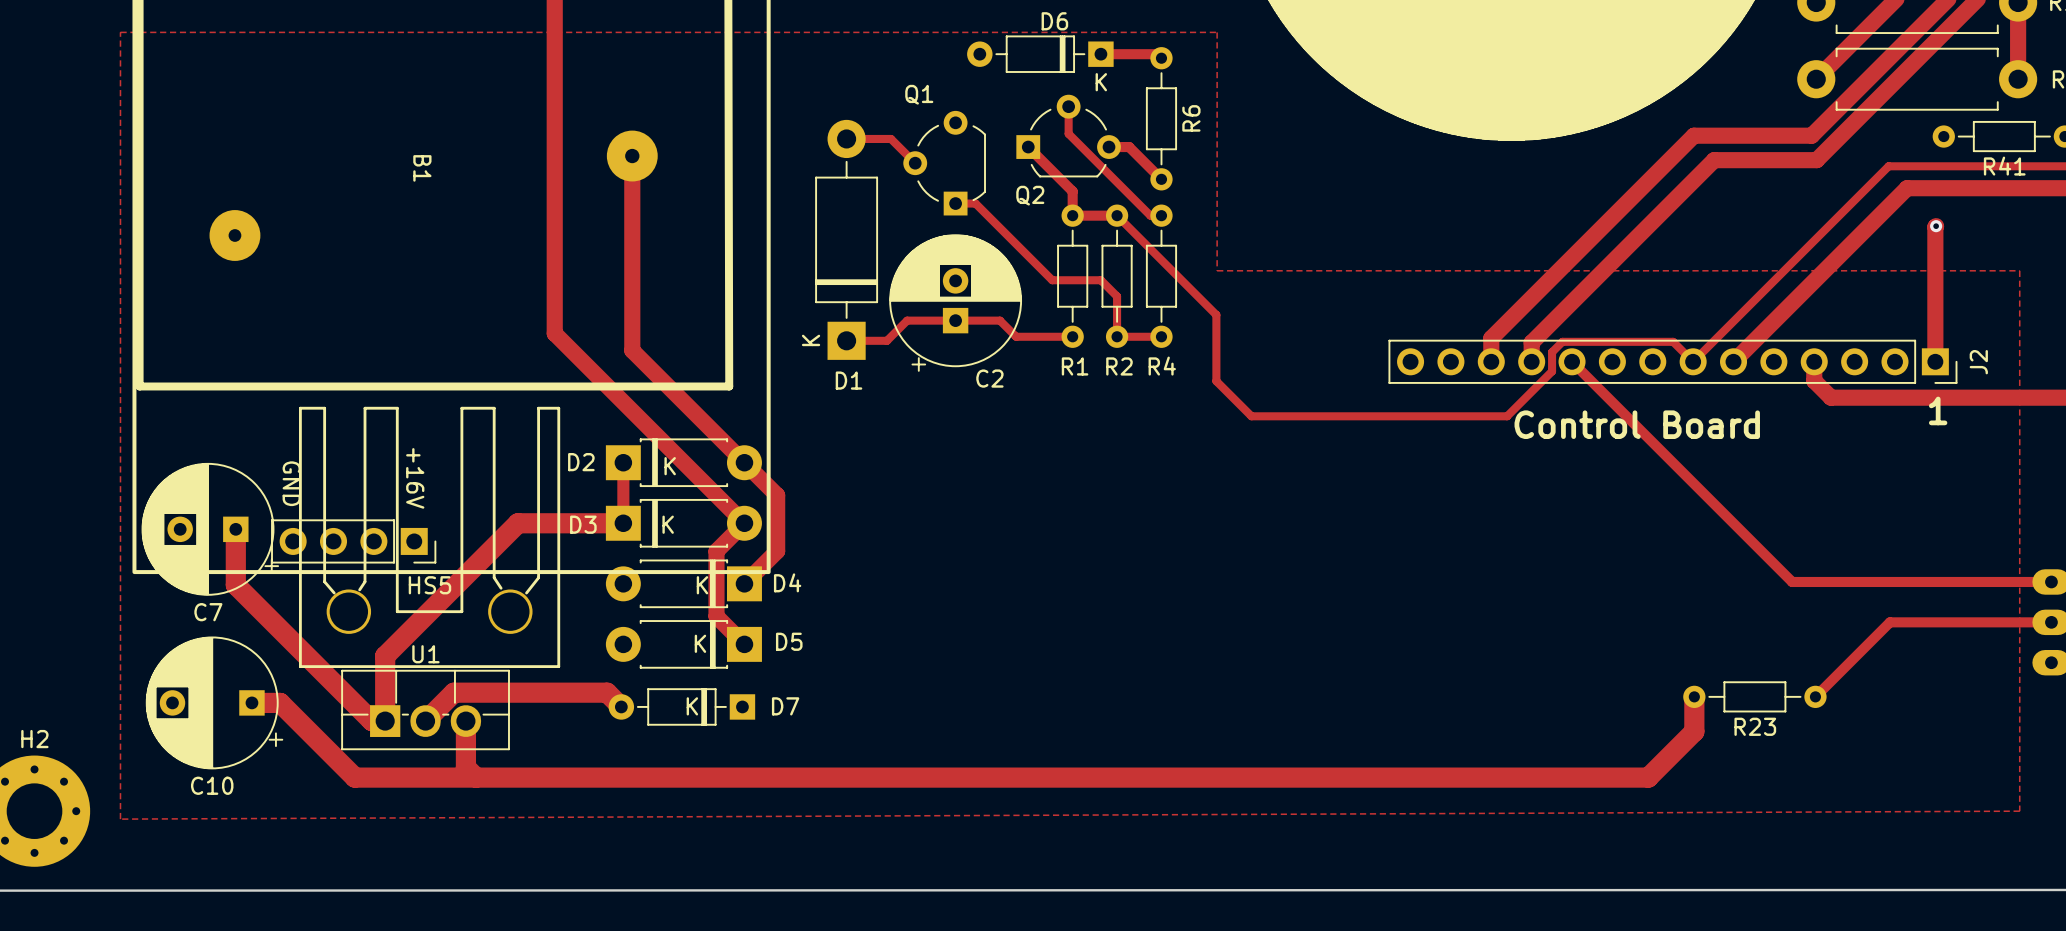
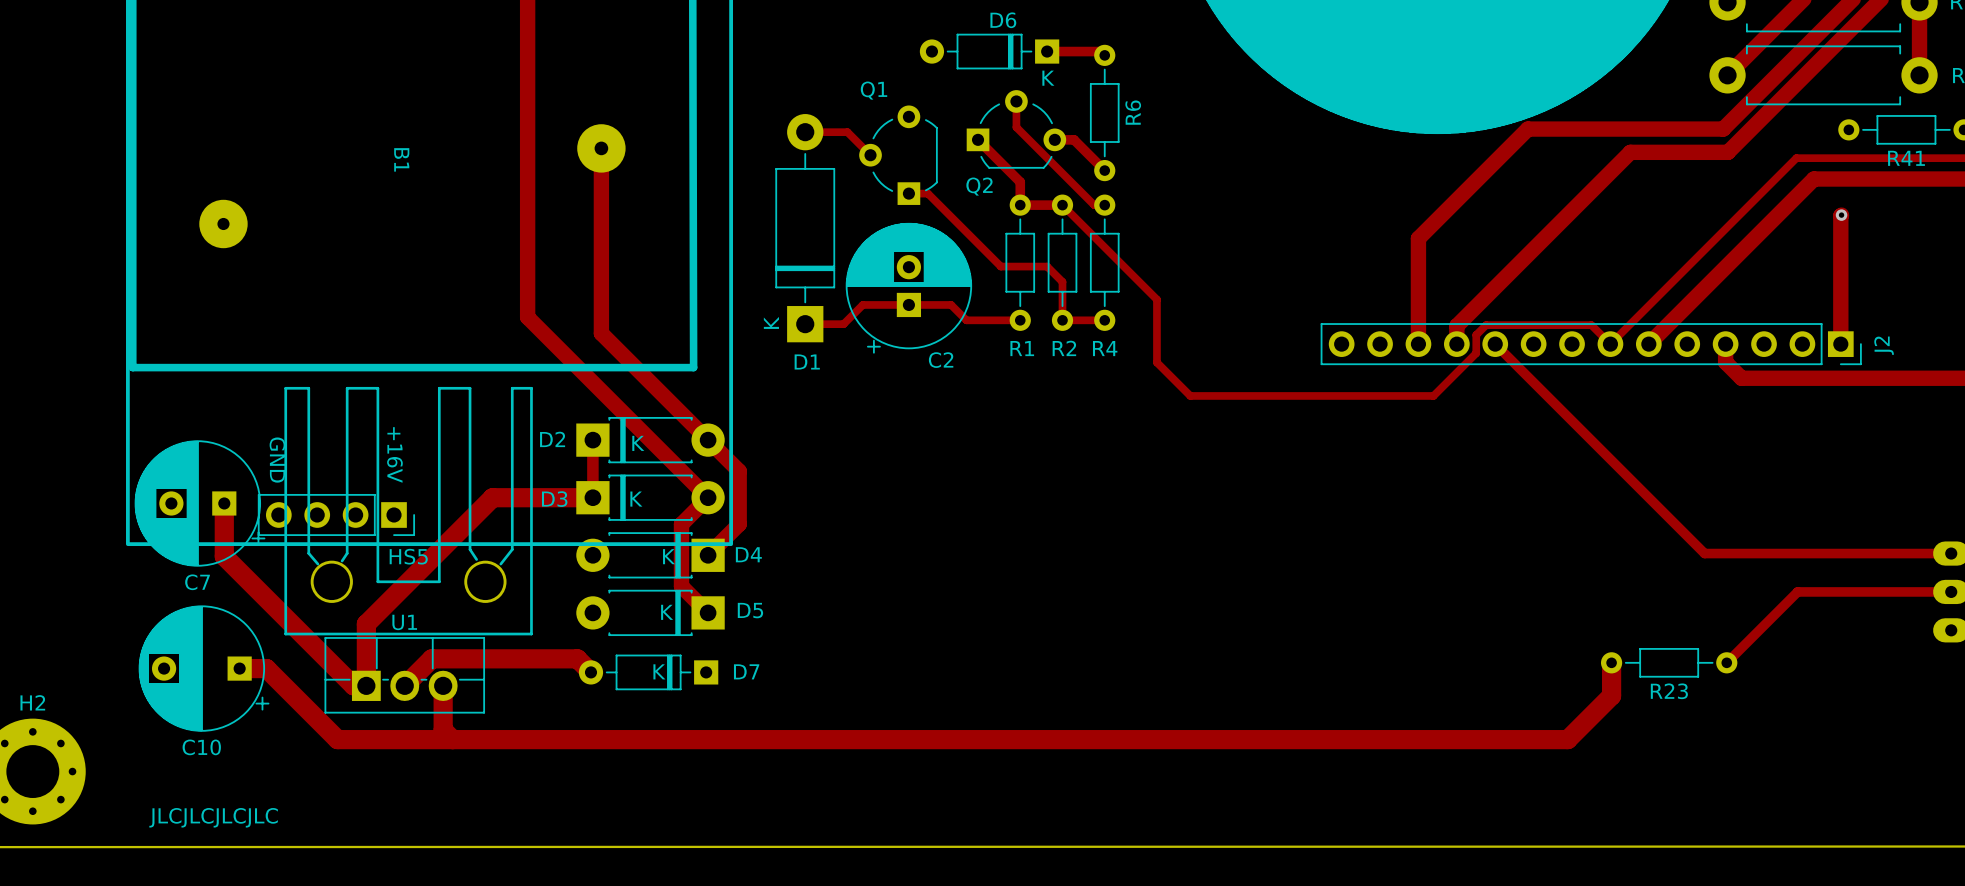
zone outline: (120, 32) (120, 819) (2019, 811) (2019, 270) (1217, 270) (1217, 32) (120, 32) -> none
track: (1693, 135) (1491, 338) -> (1611, 129) (1527, 129) (1418, 238) (1418, 321)
text: 1 (1938, 410) -> none
text: Control Board (1637, 424) -> none
text: none -> JLCJLCJLCJLC (213, 817)

